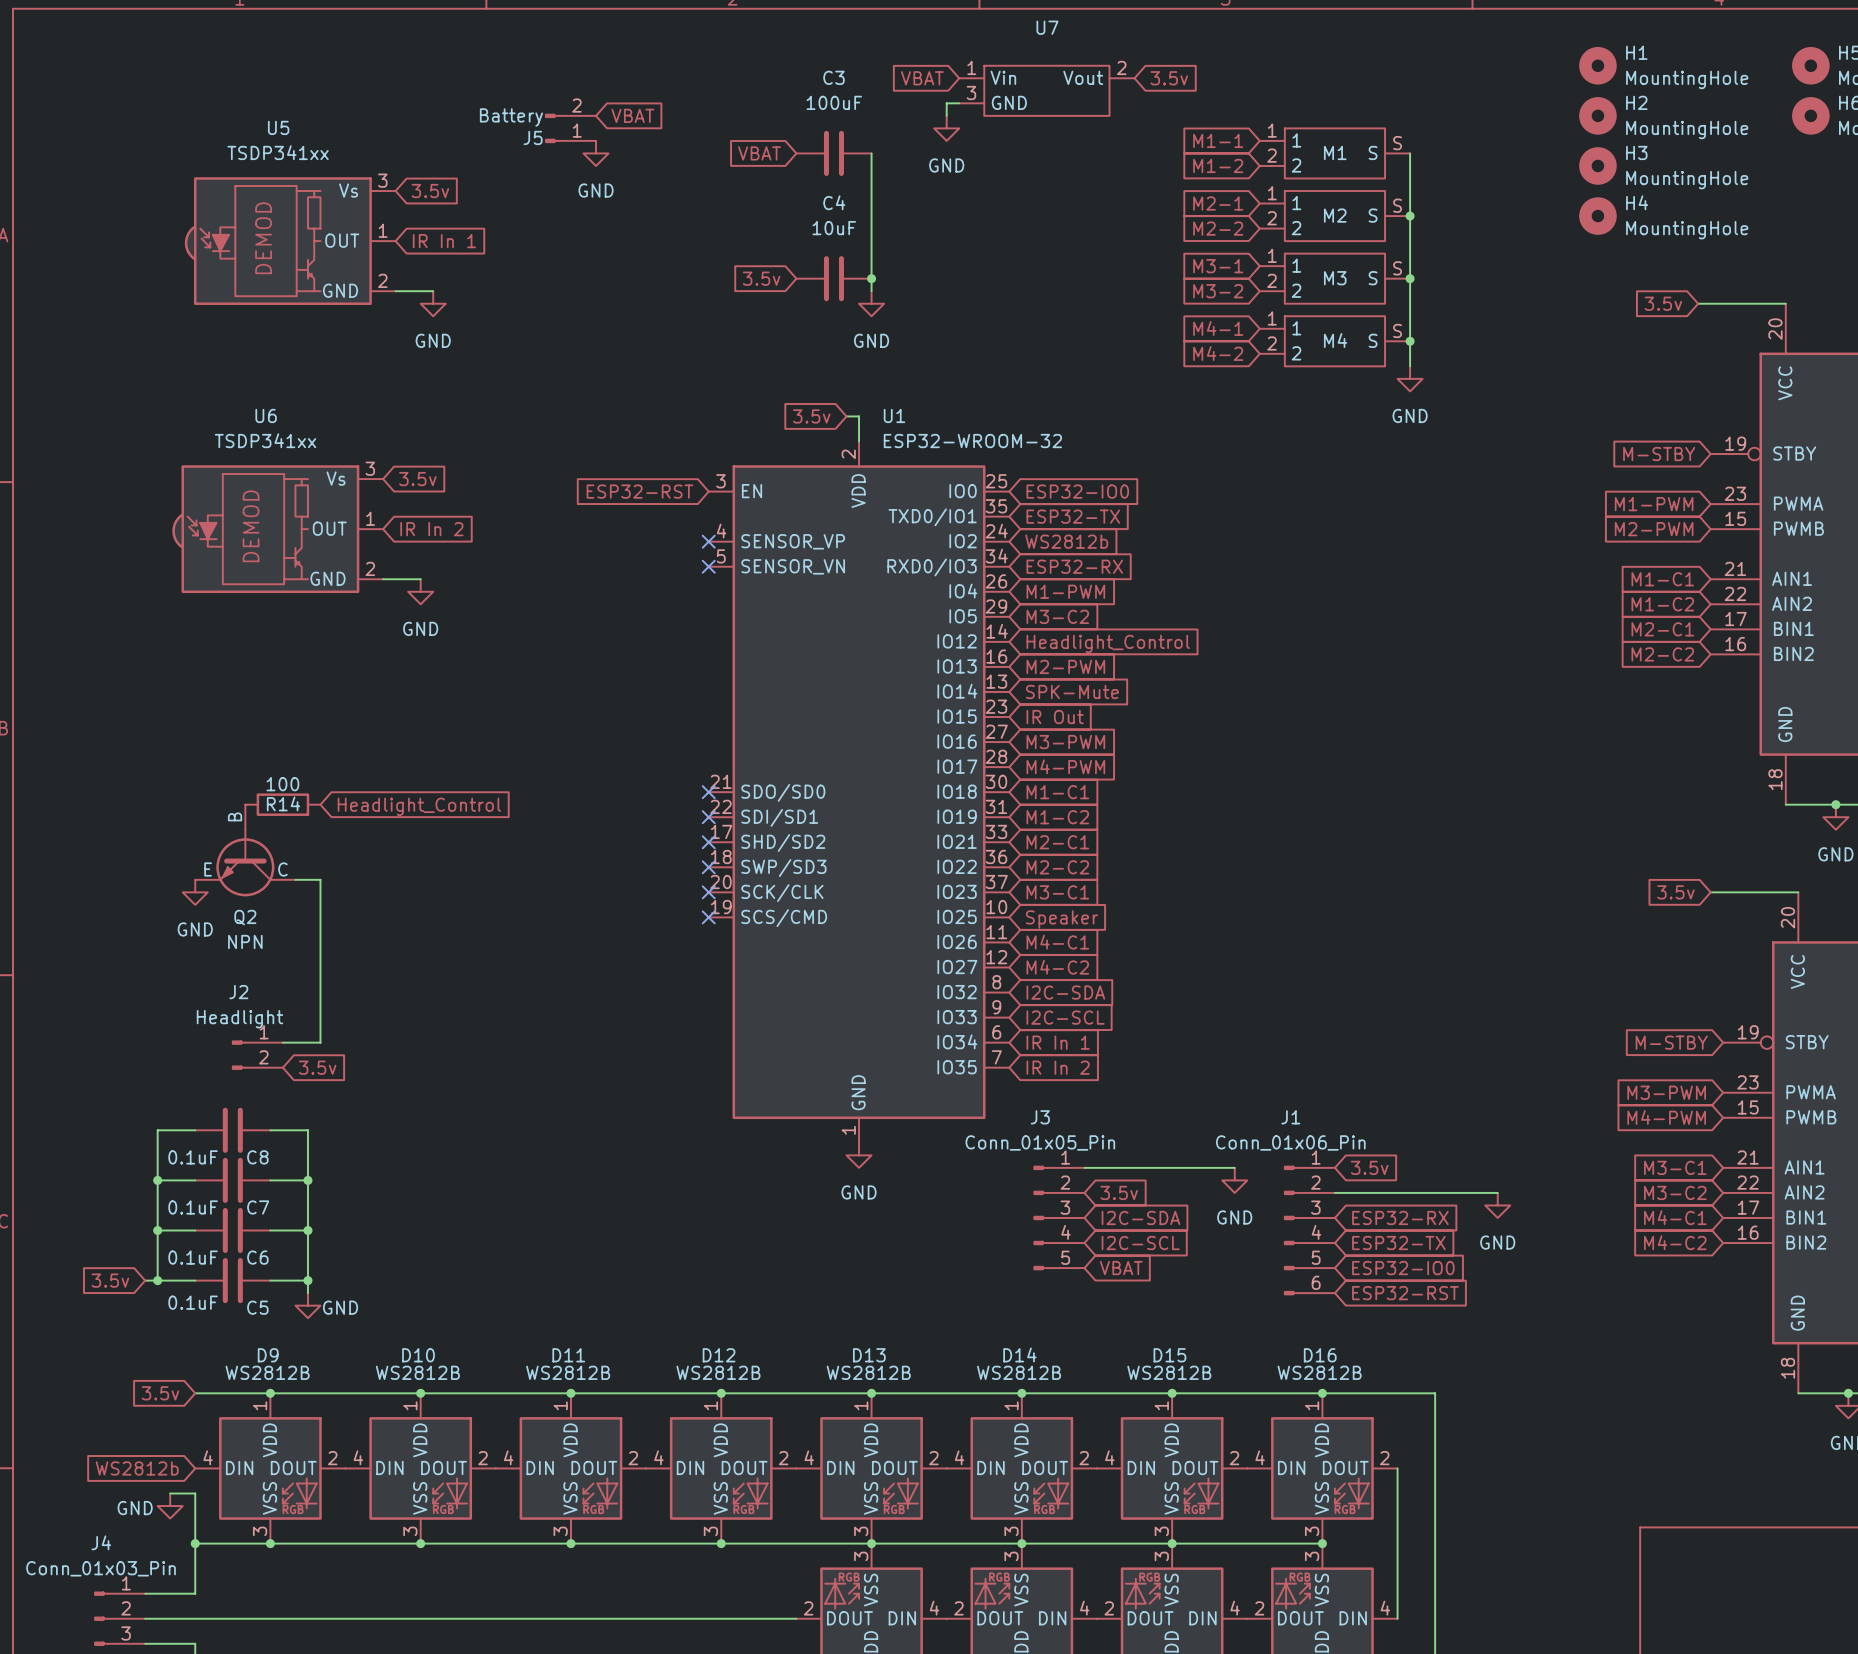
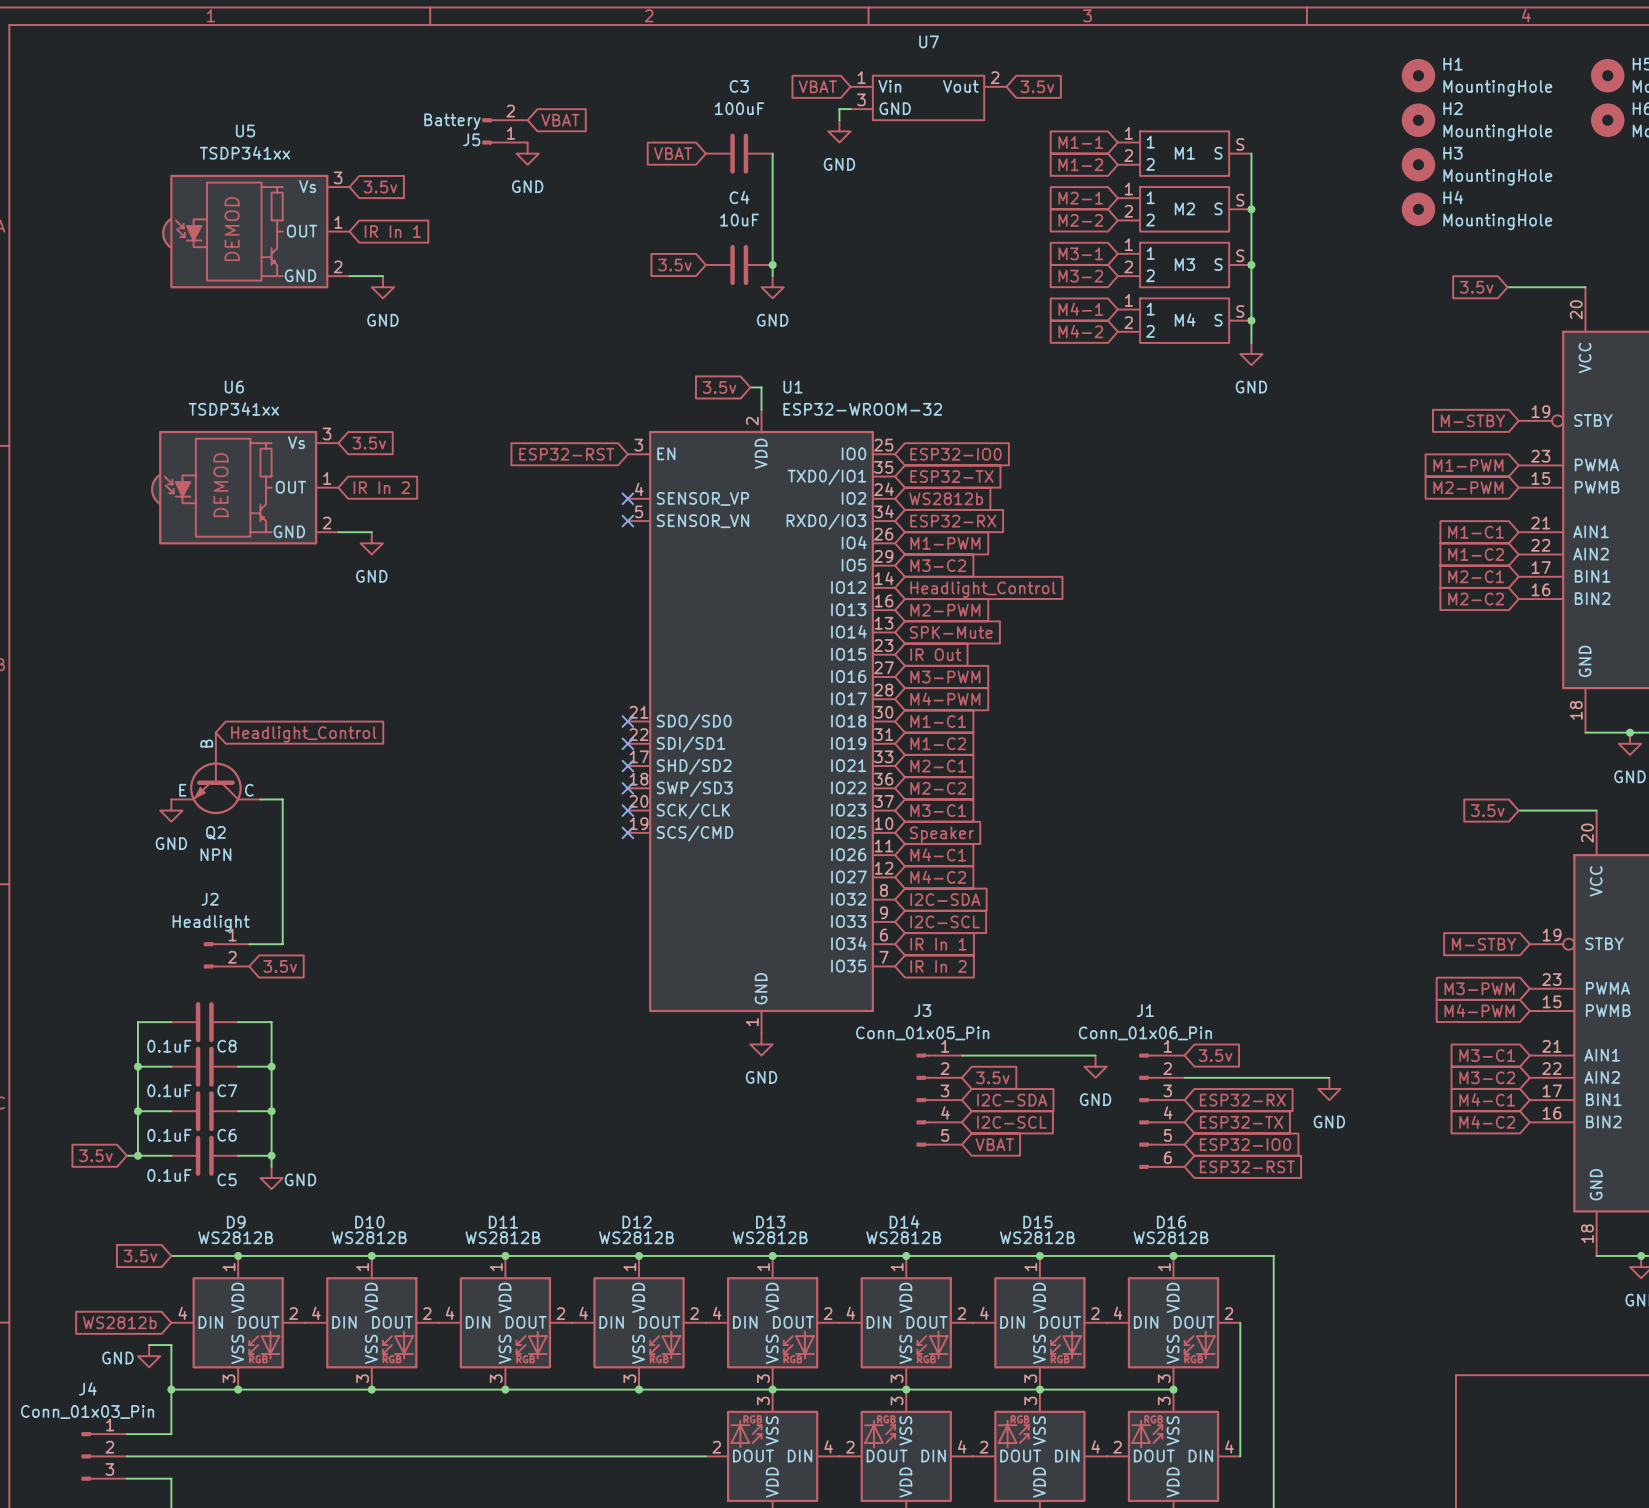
R14: 100 (282, 804) -> none
global label position: Headlight_Control (419, 806) -> Headlight_Control (303, 734)

